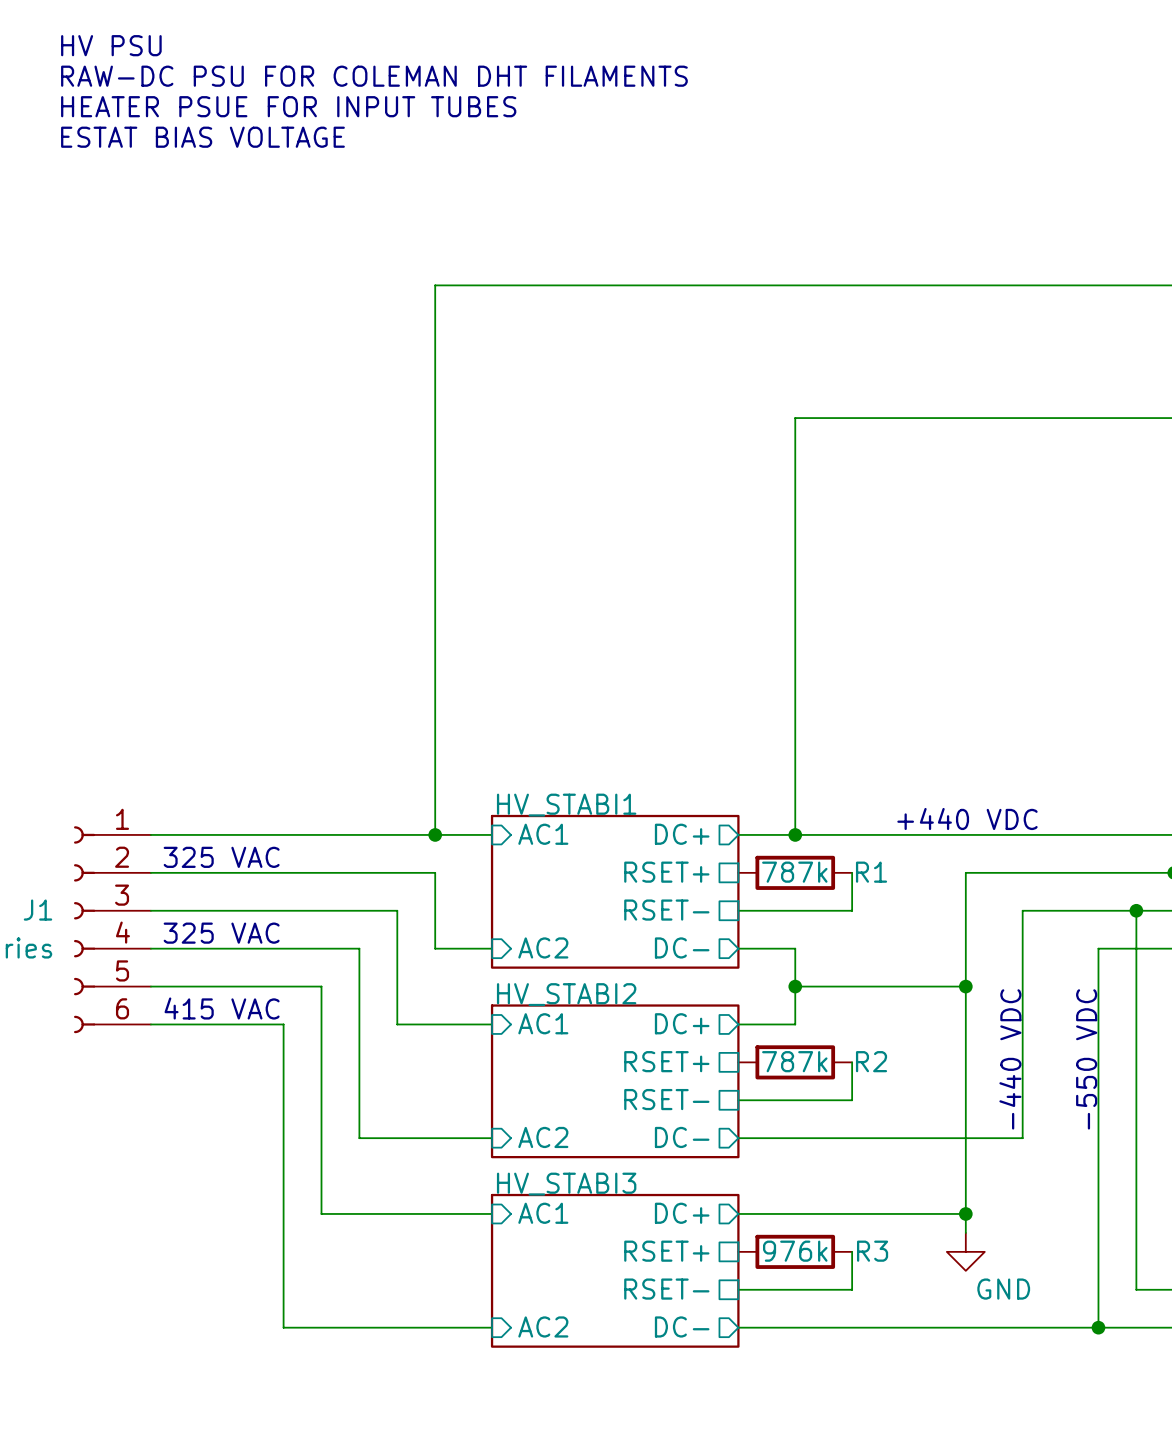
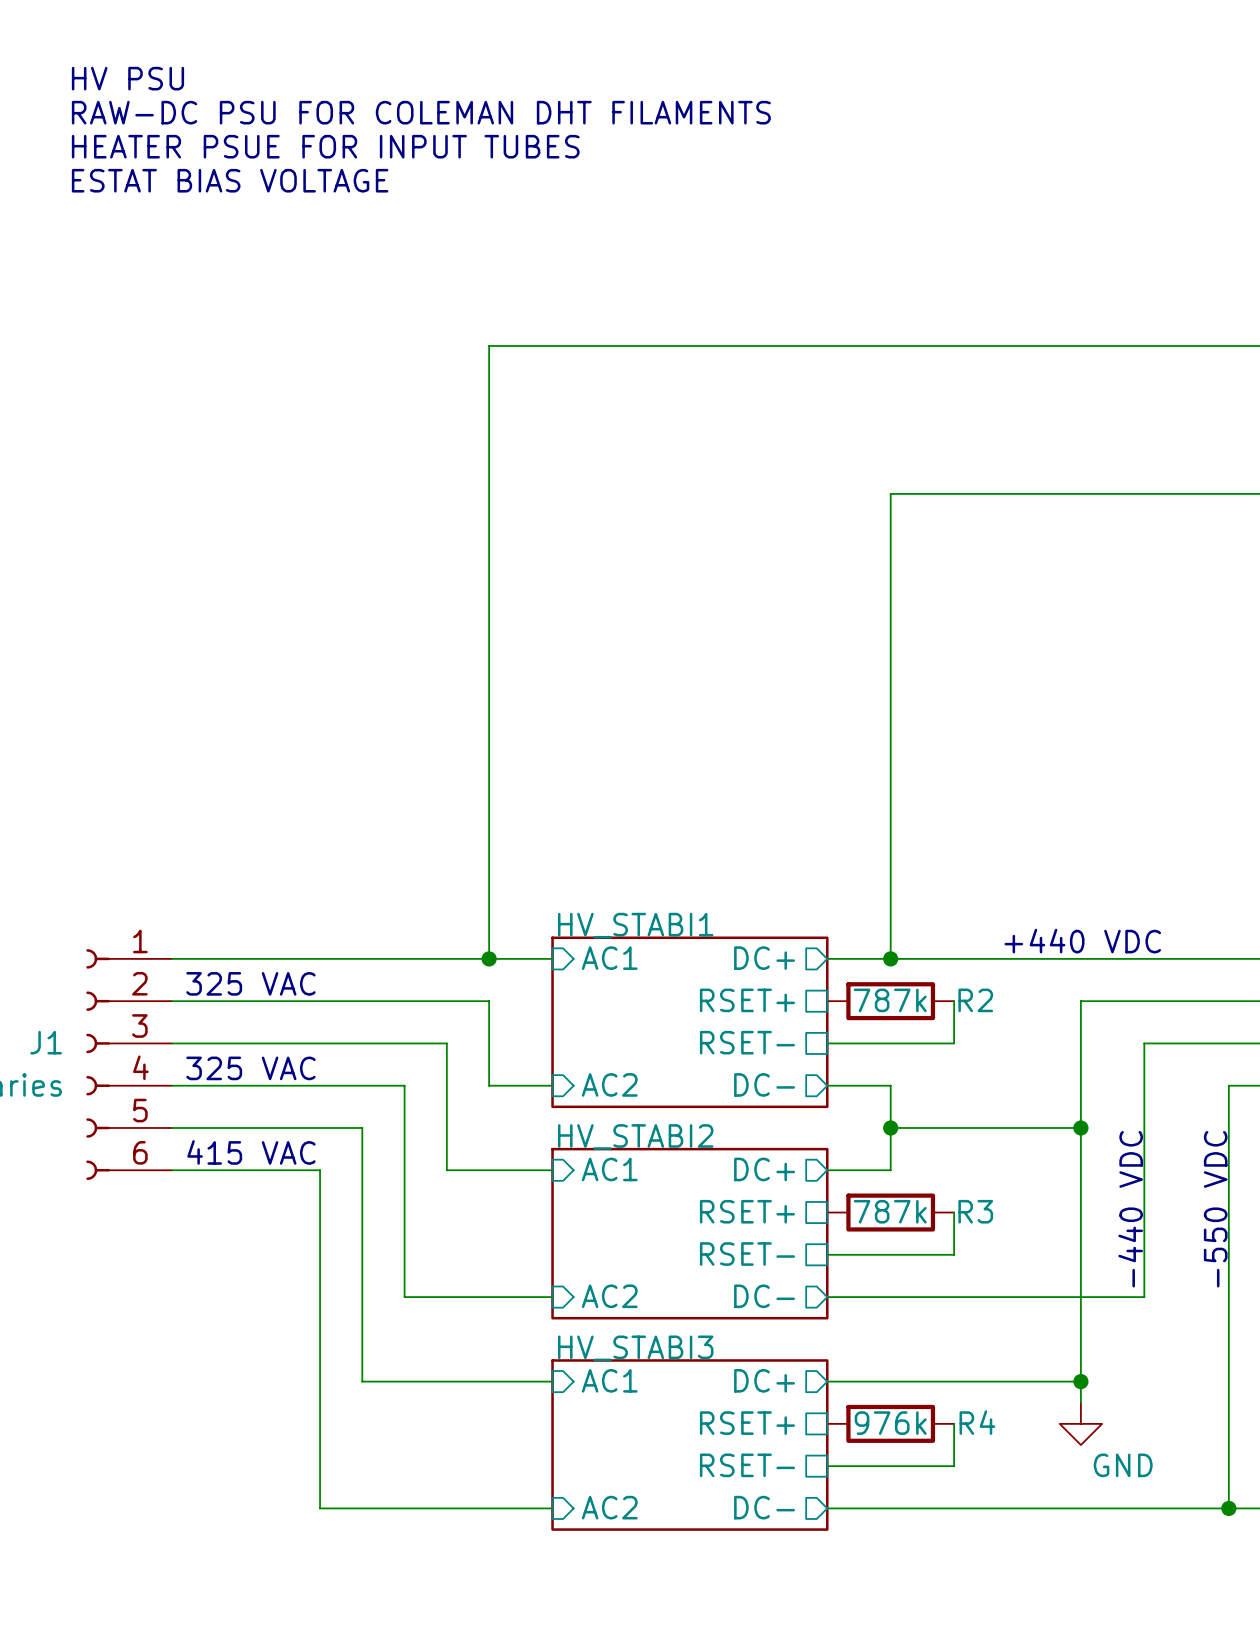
R1 name: R1 (871, 872) -> R2 (975, 1000)
R2 name: R2 (871, 1061) -> R3 (975, 1211)
R3 name: R3 (872, 1251) -> R4 (977, 1422)

